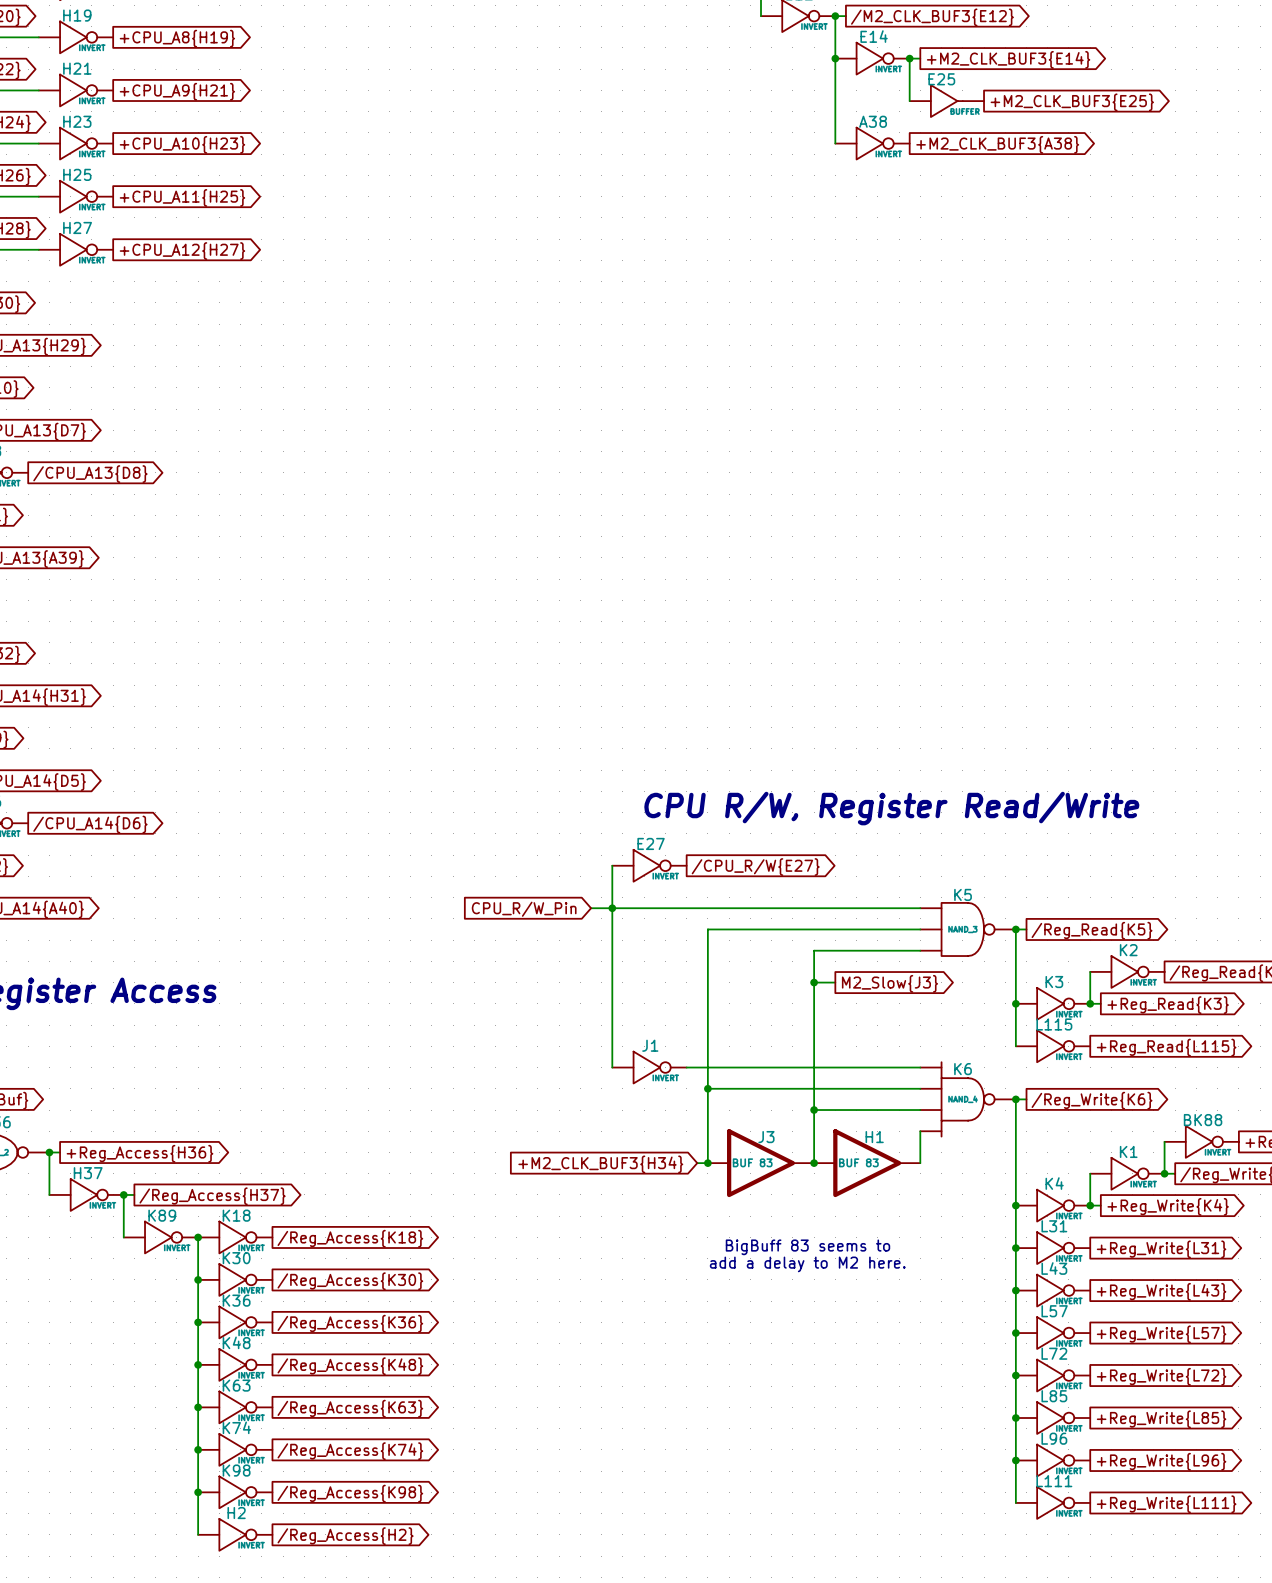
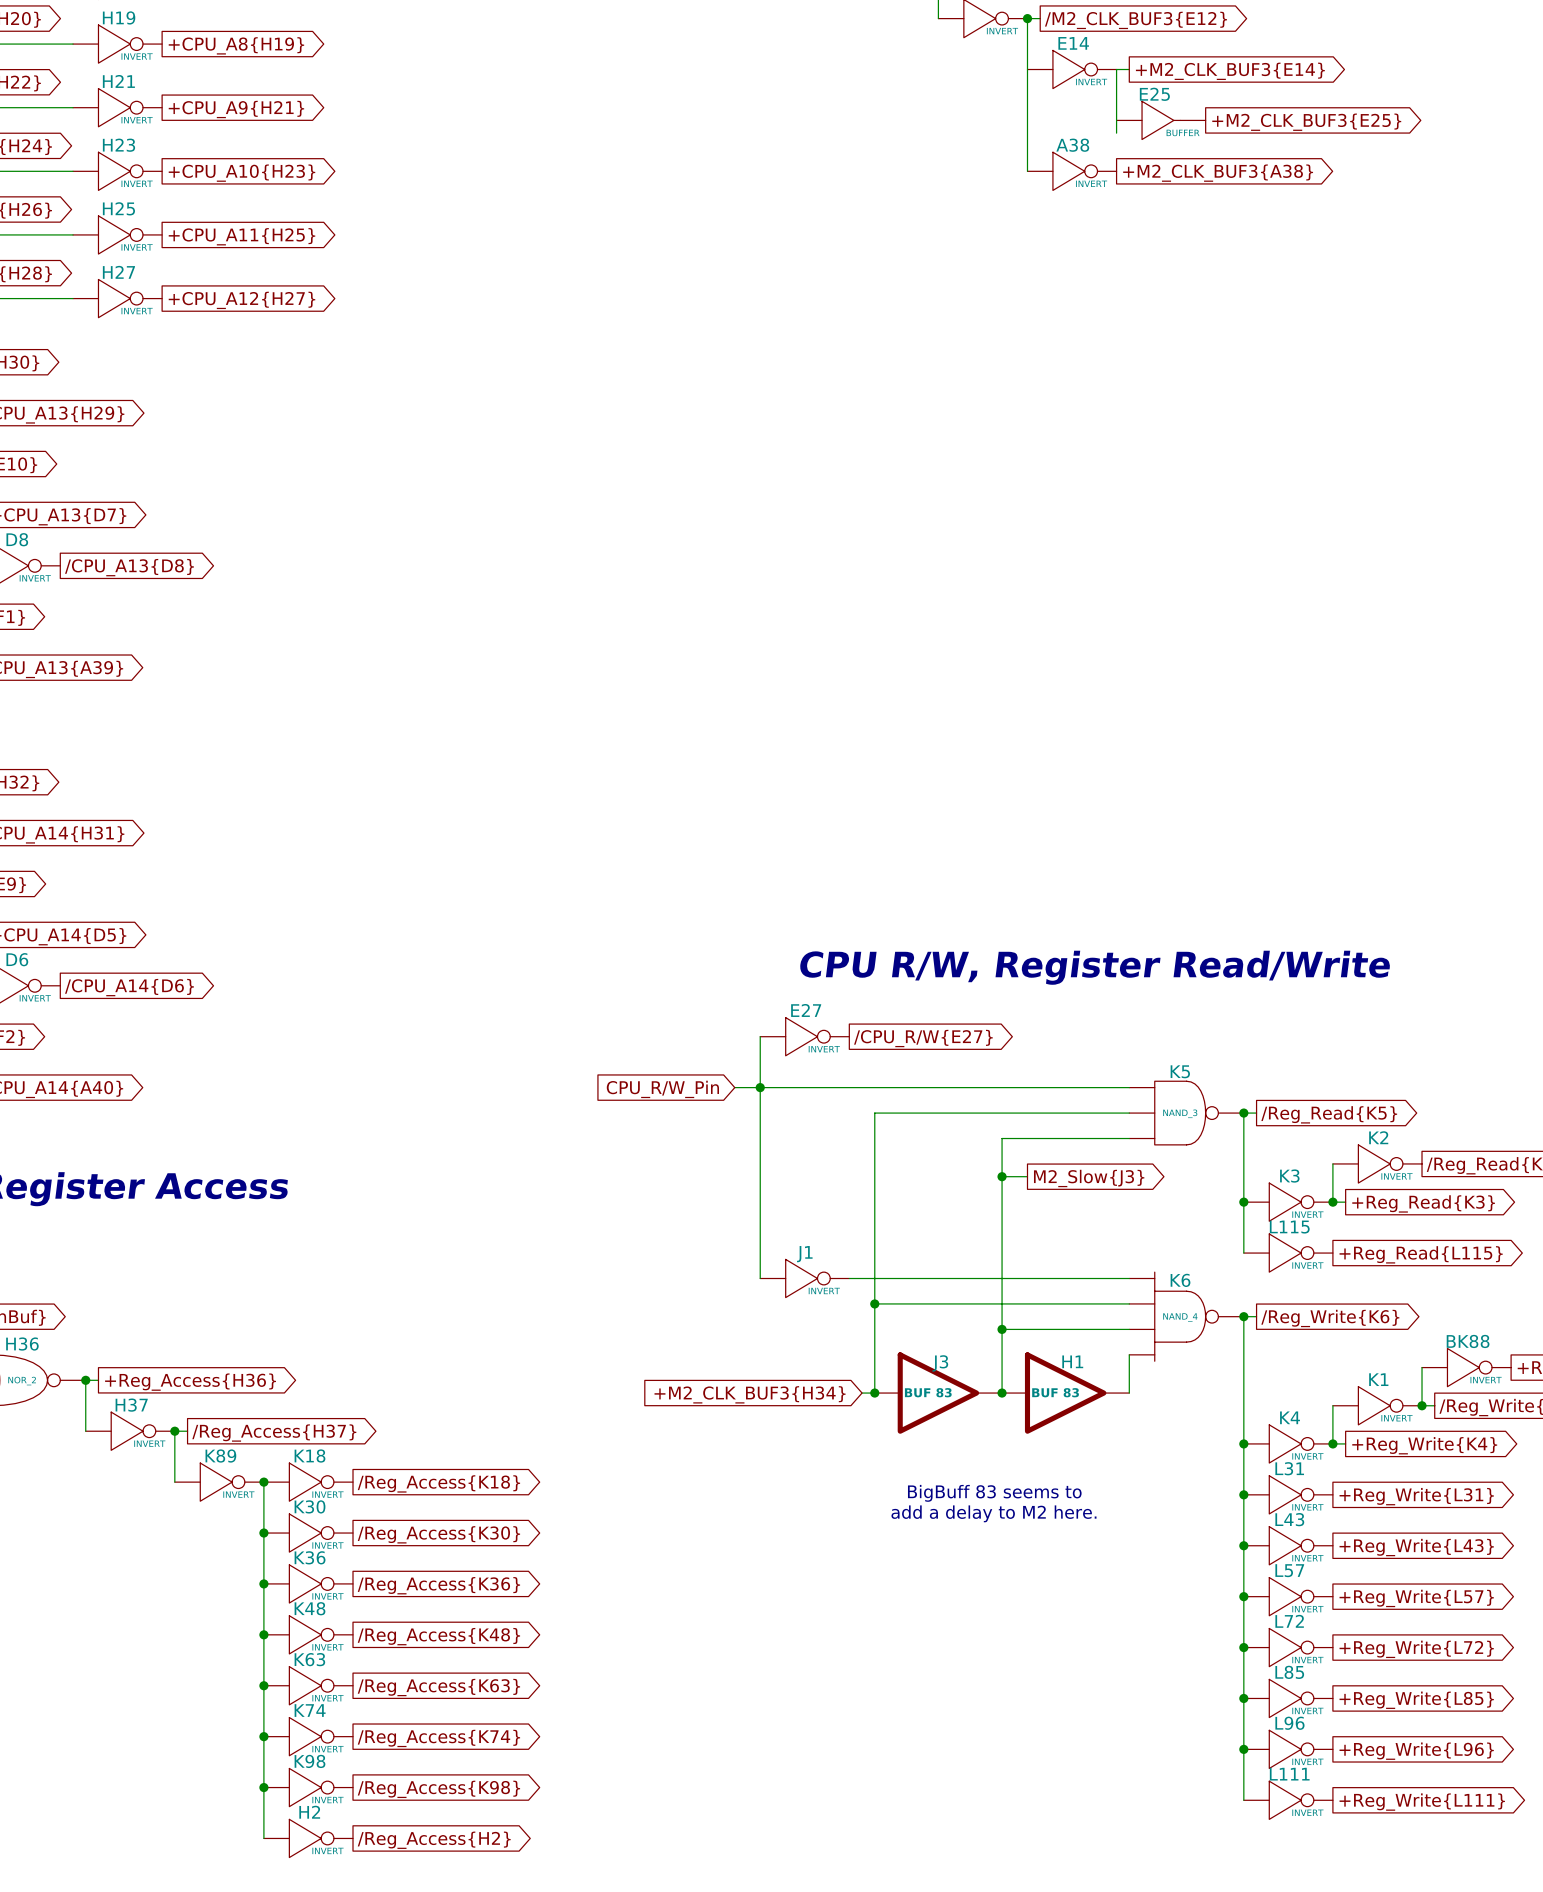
junction: (835, 58) -> none
junction: (909, 58) -> none
wire: none -> (1116, 120) (1116, 133)

